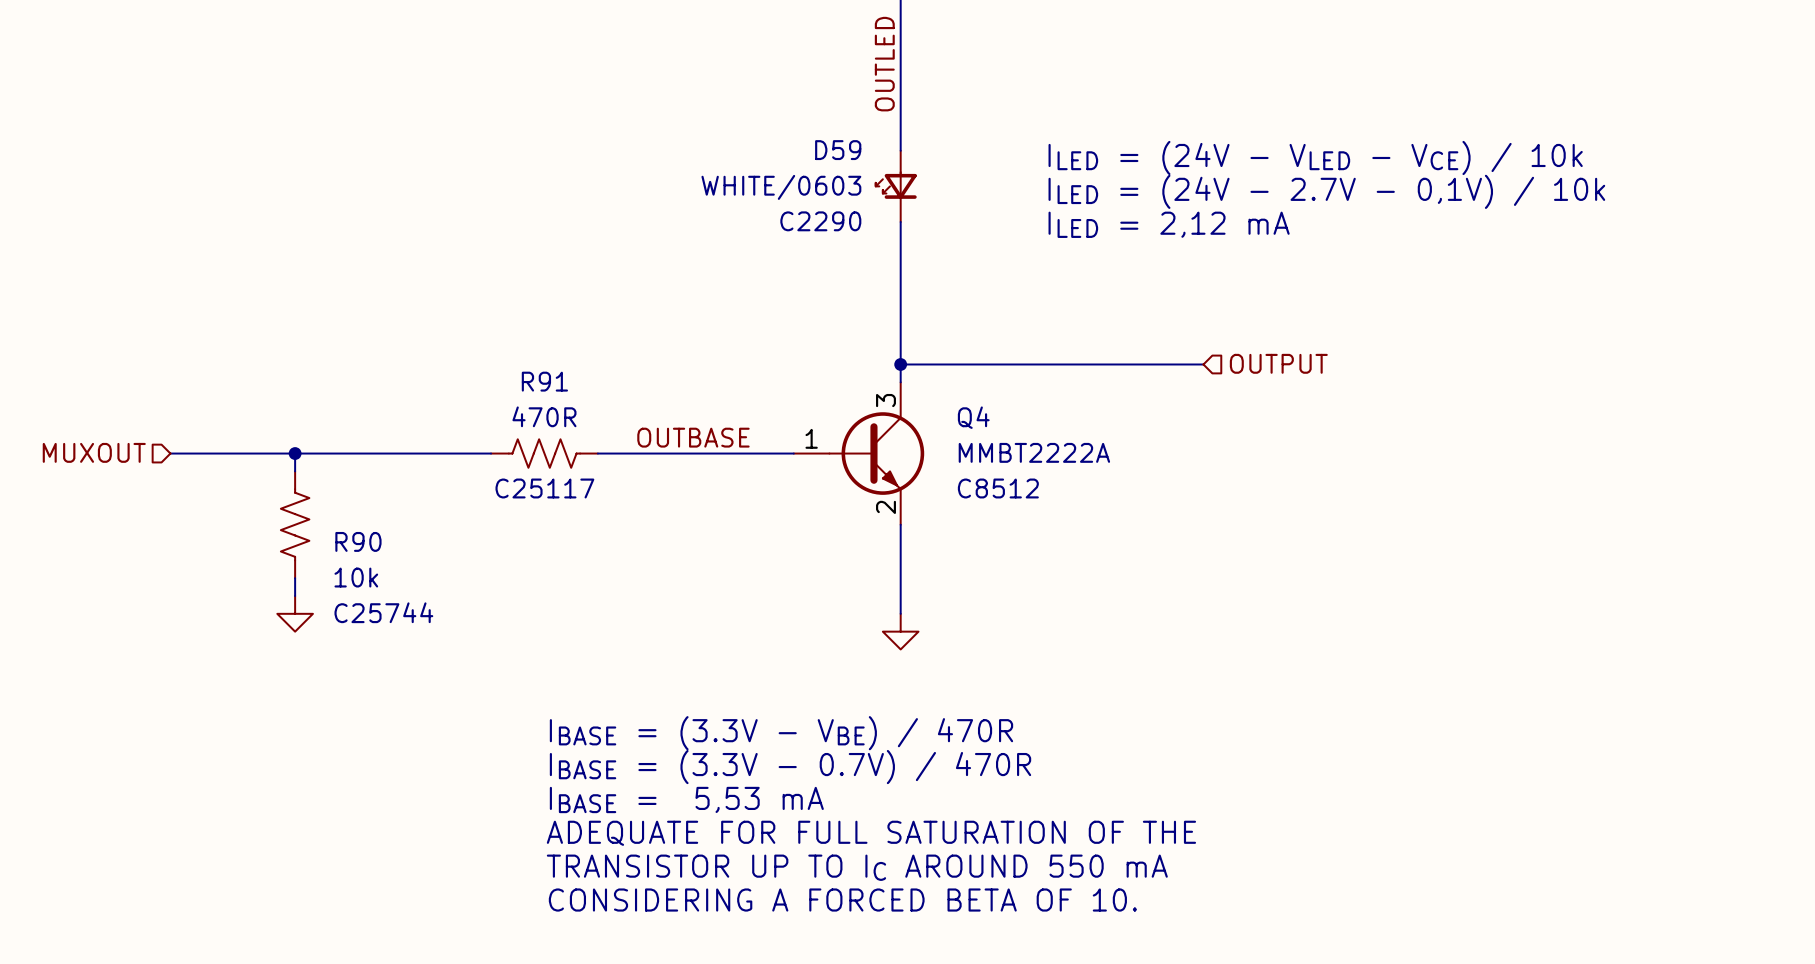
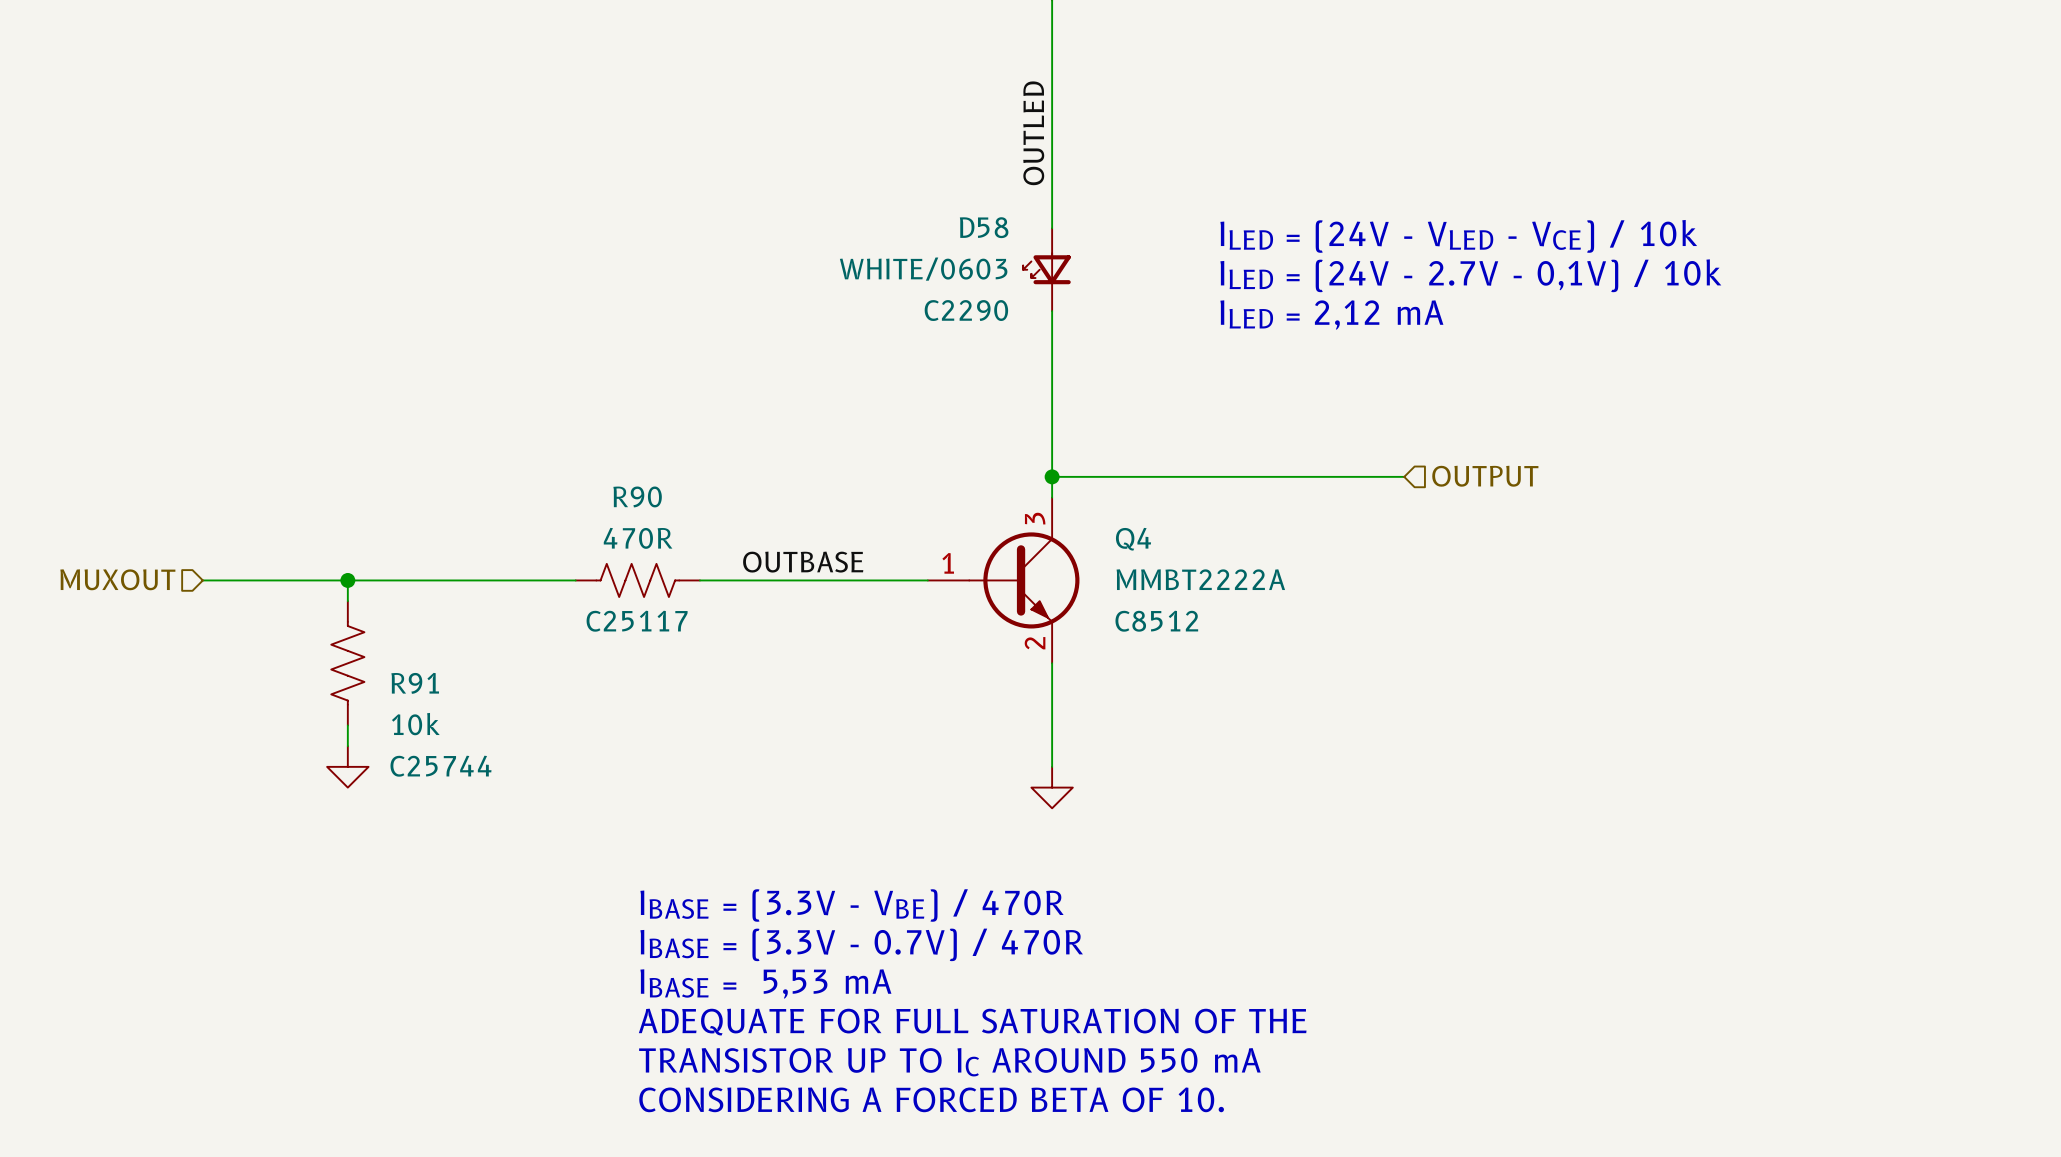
D59 name: D59 (838, 150) -> D58 (984, 227)
R91 name: R91 (544, 381) -> R90 (637, 496)
R90 name: R90 (358, 541) -> R91 (415, 683)

